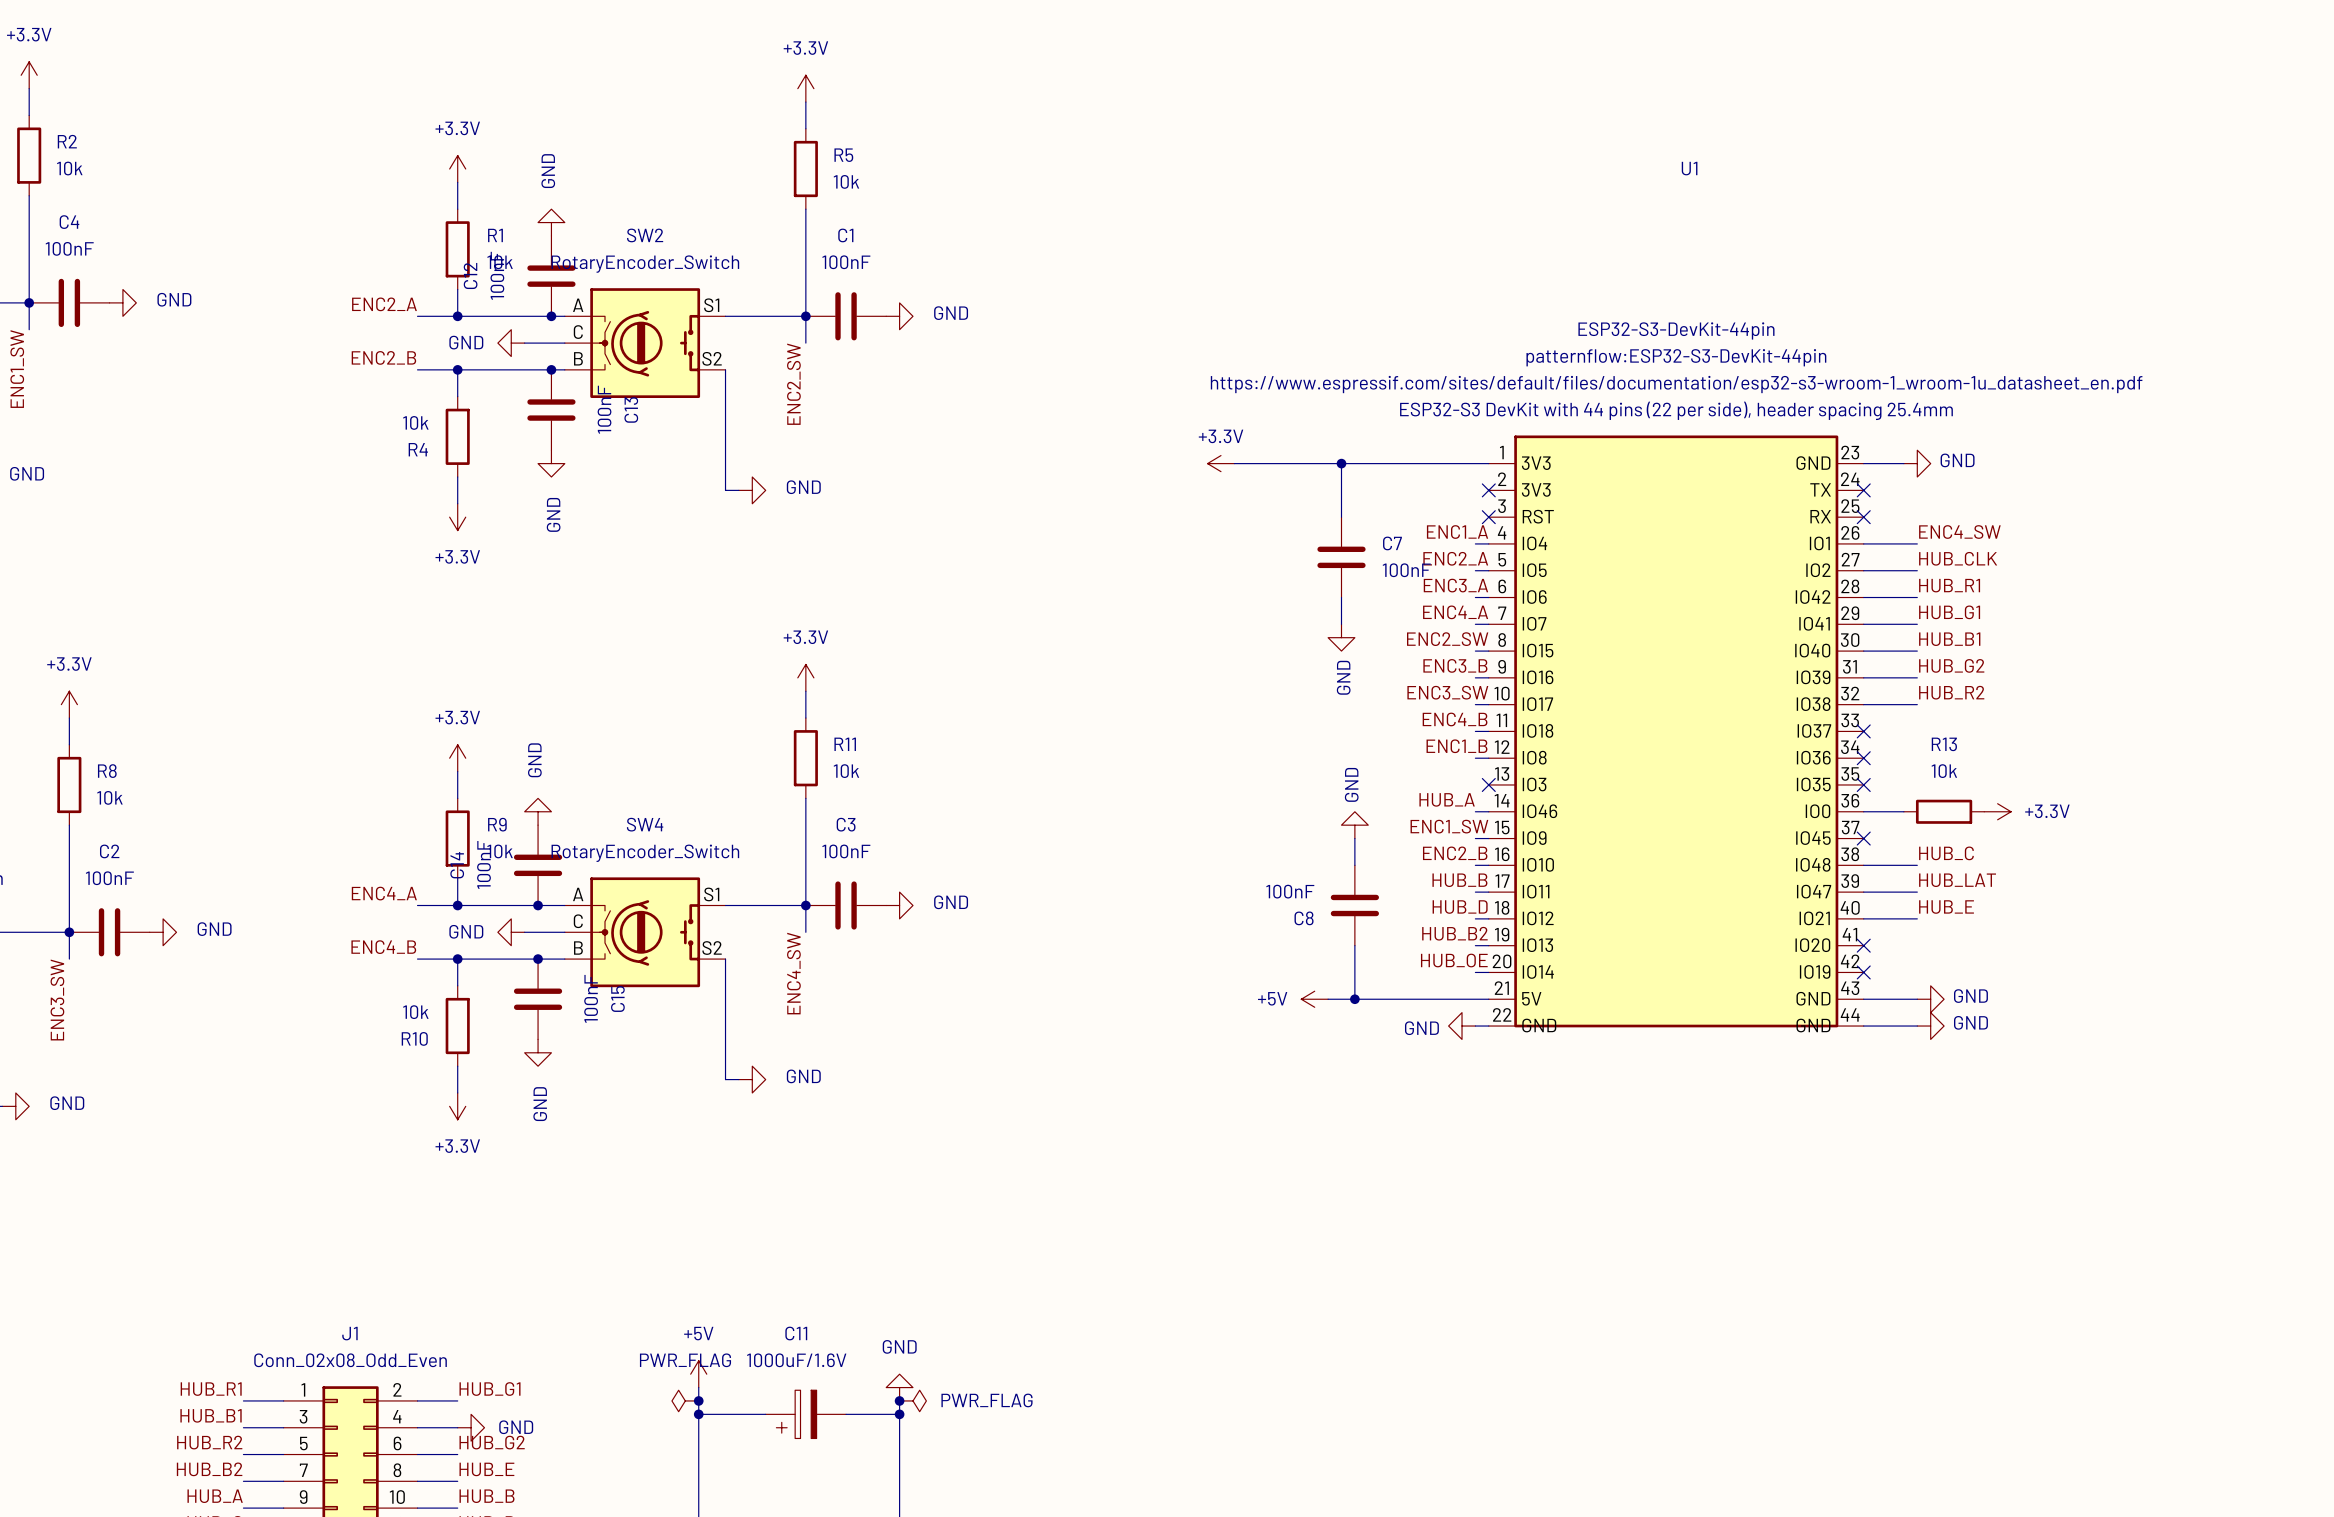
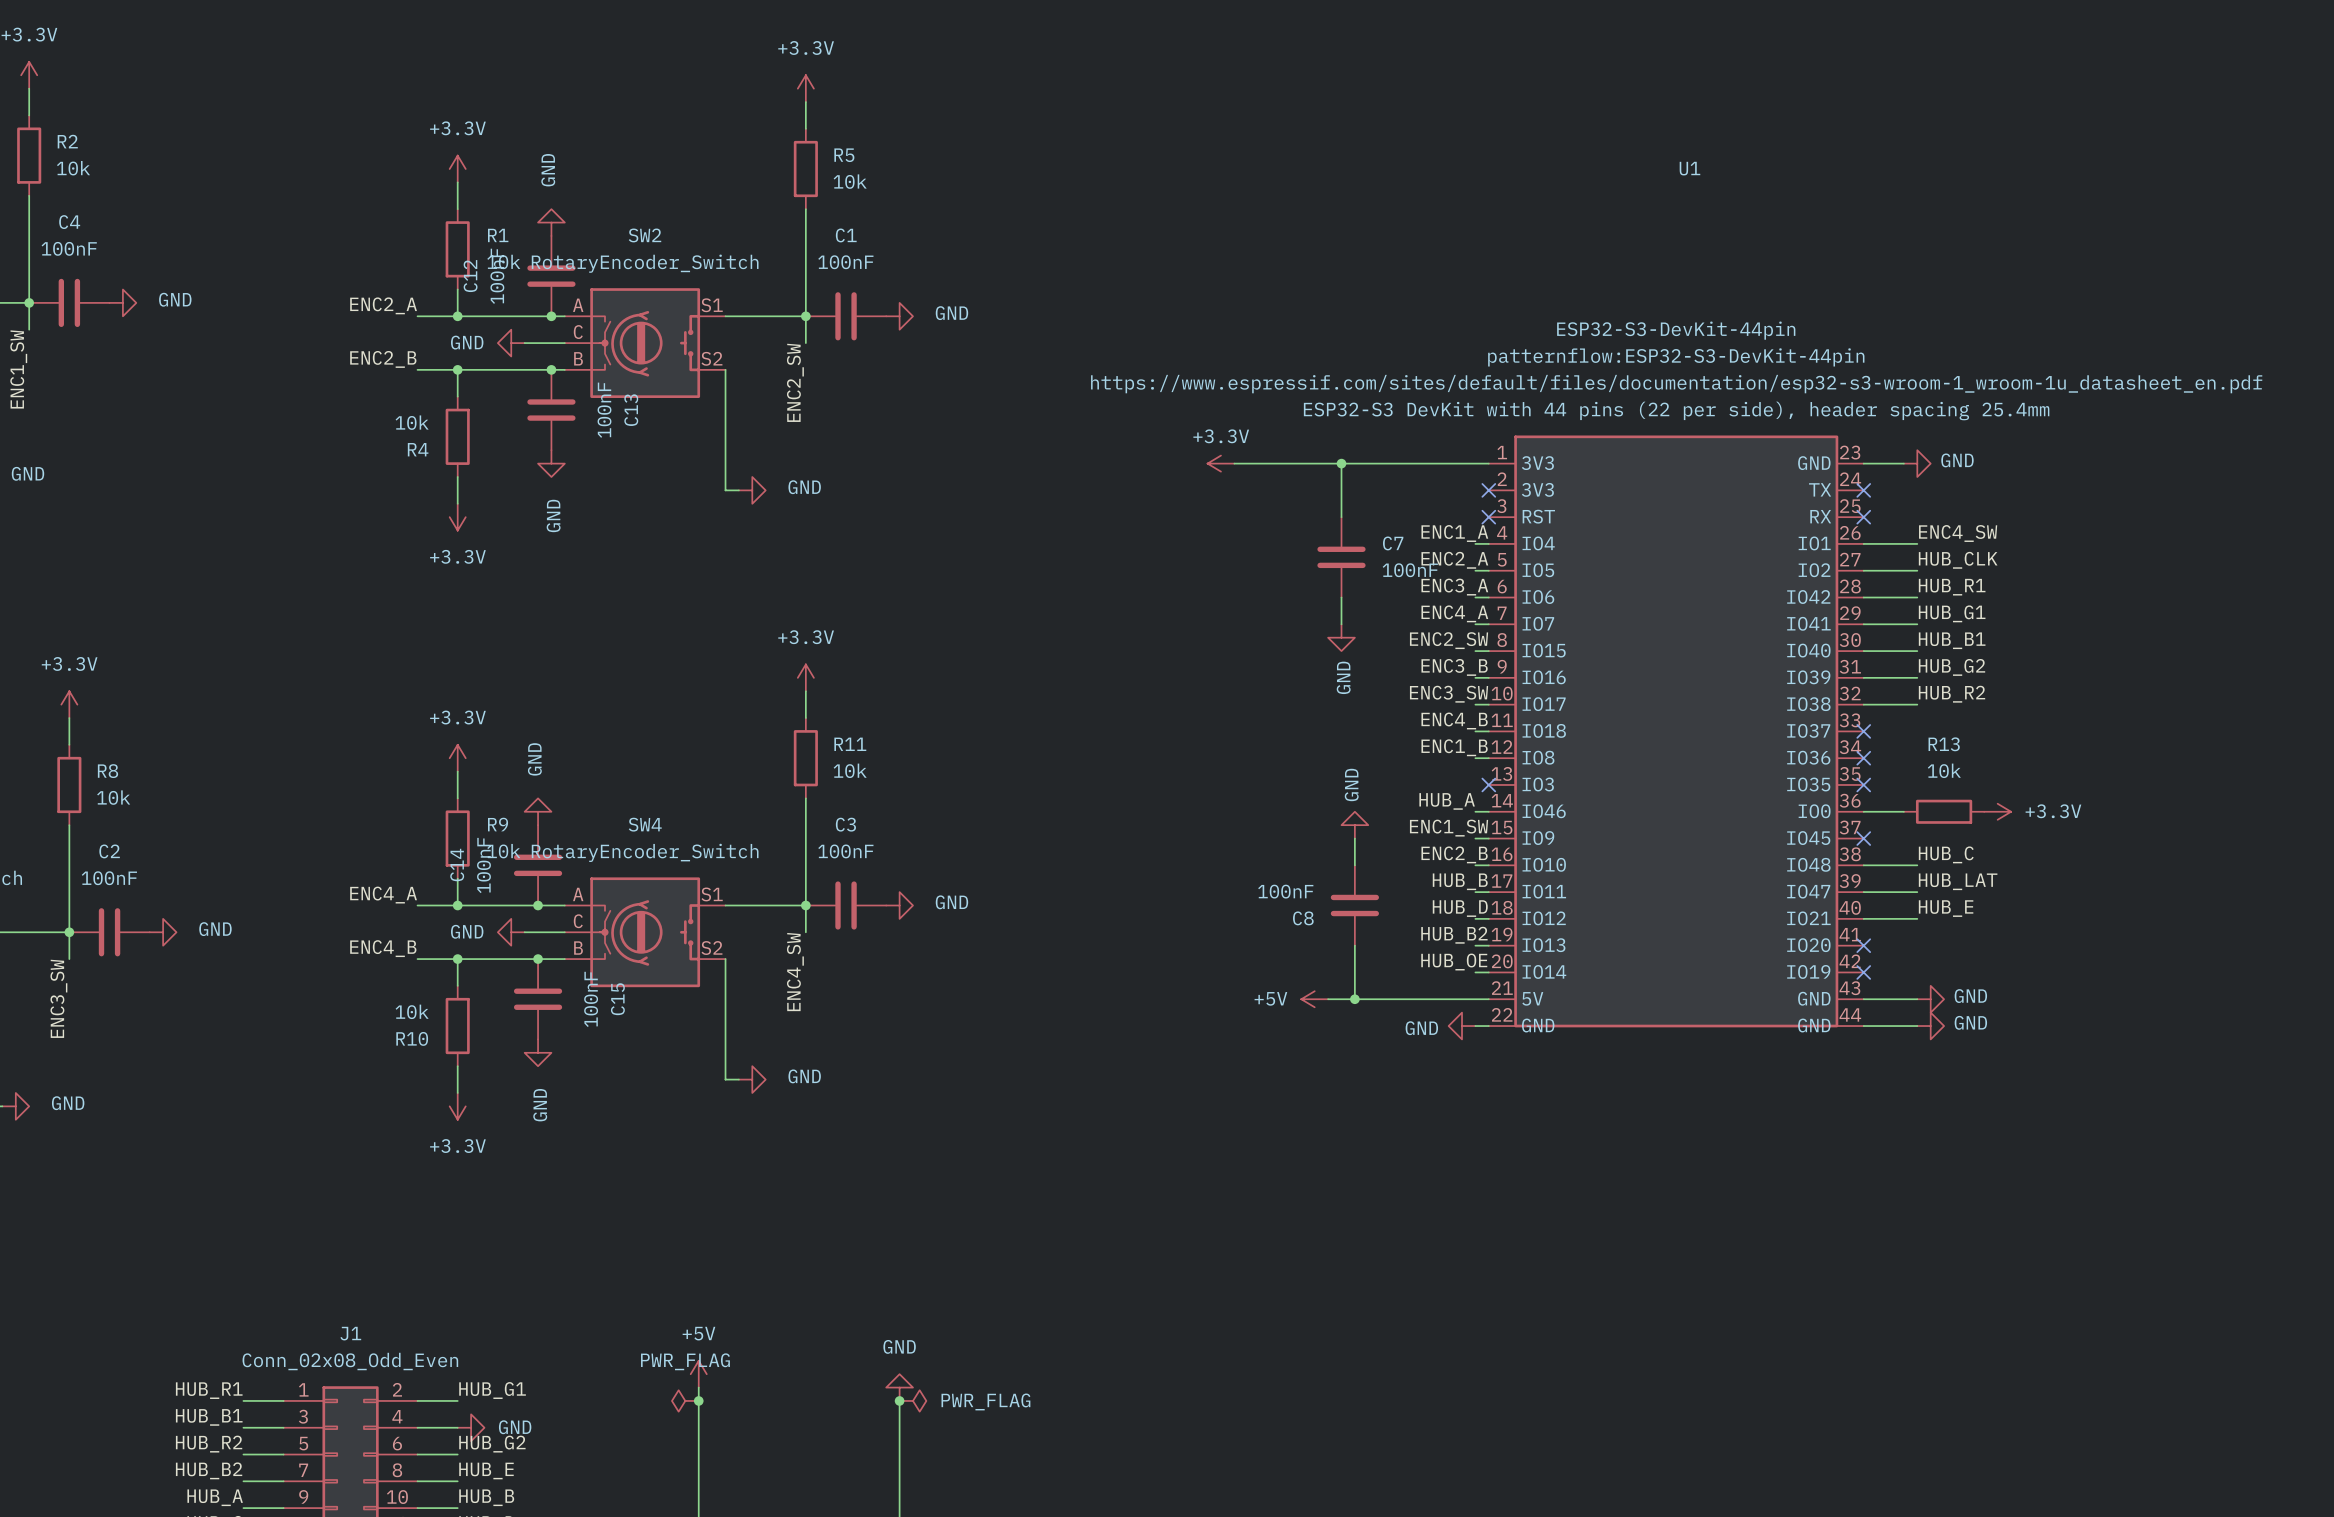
wire: (698, 1414) (765, 1414) -> none
junction: (698, 1414) -> none
C11: 1000uF/1.6V (805, 1414) -> none
wire: (846, 1414) (899, 1414) -> none
junction: (899, 1414) -> none

